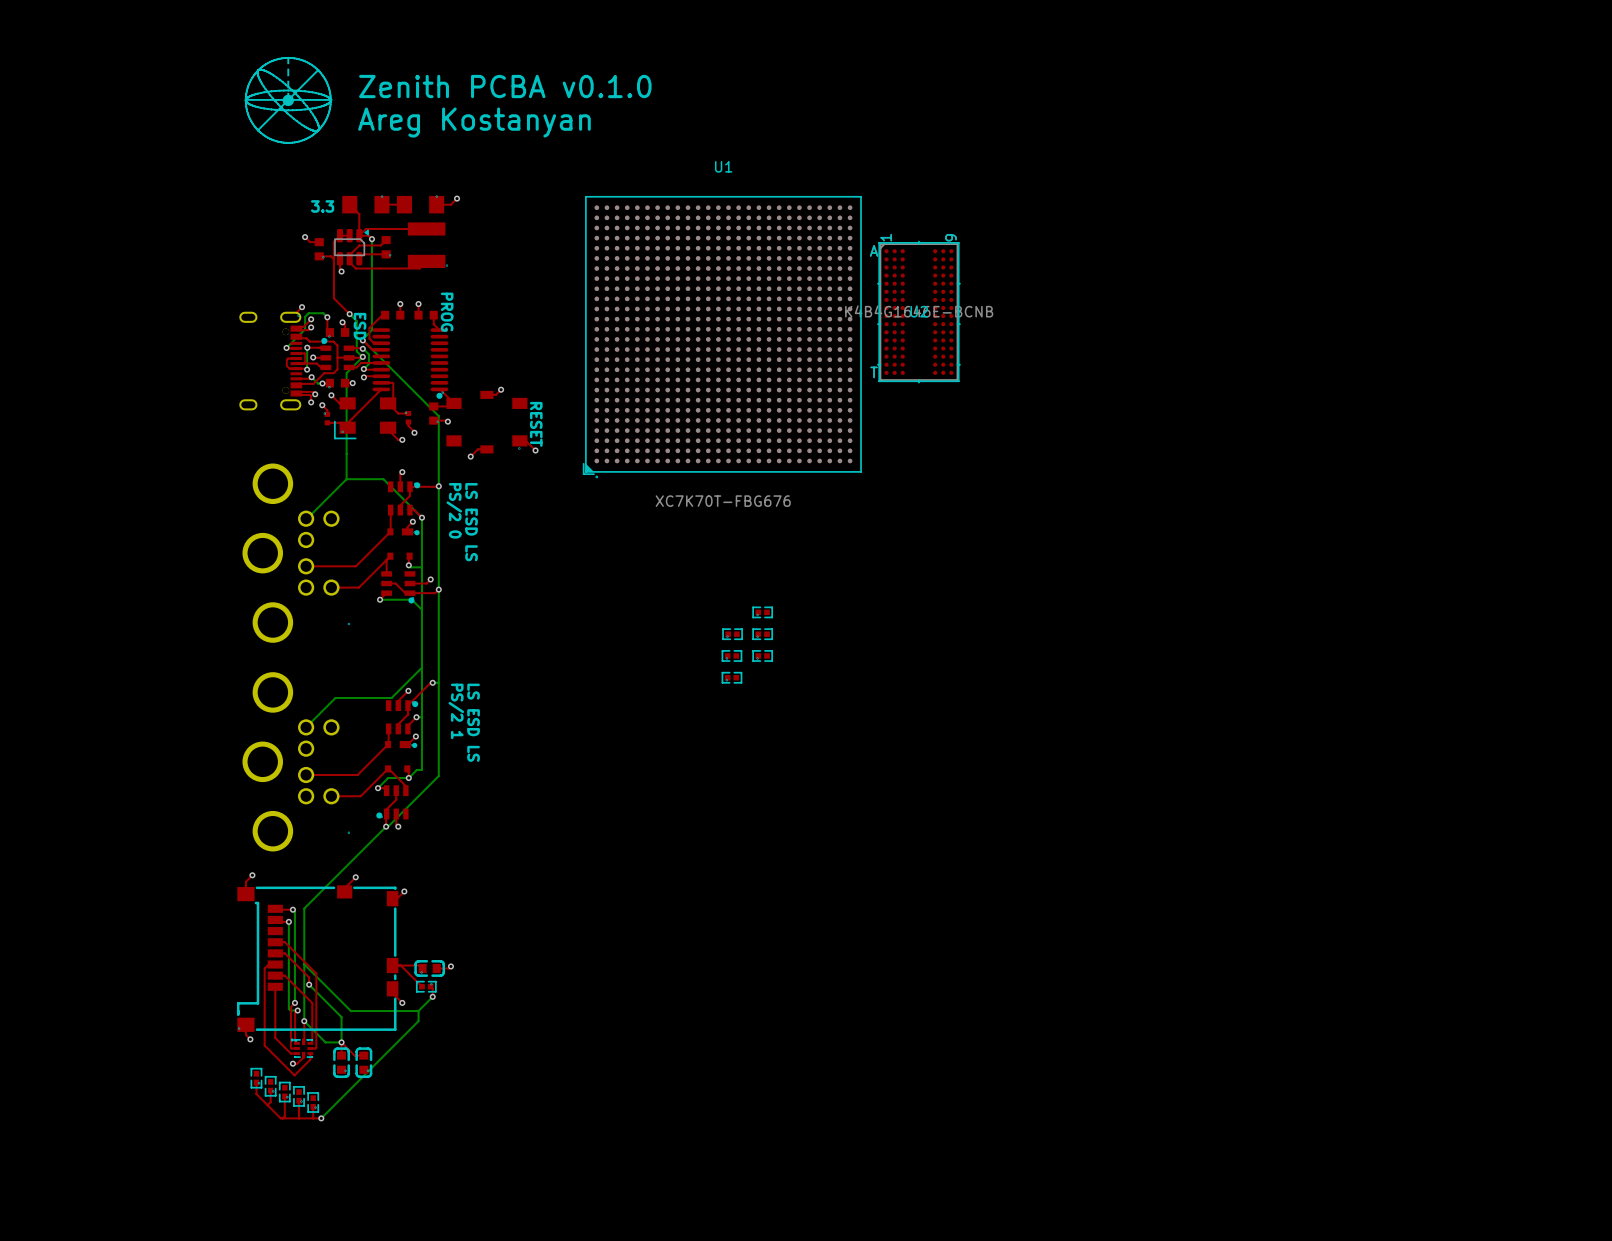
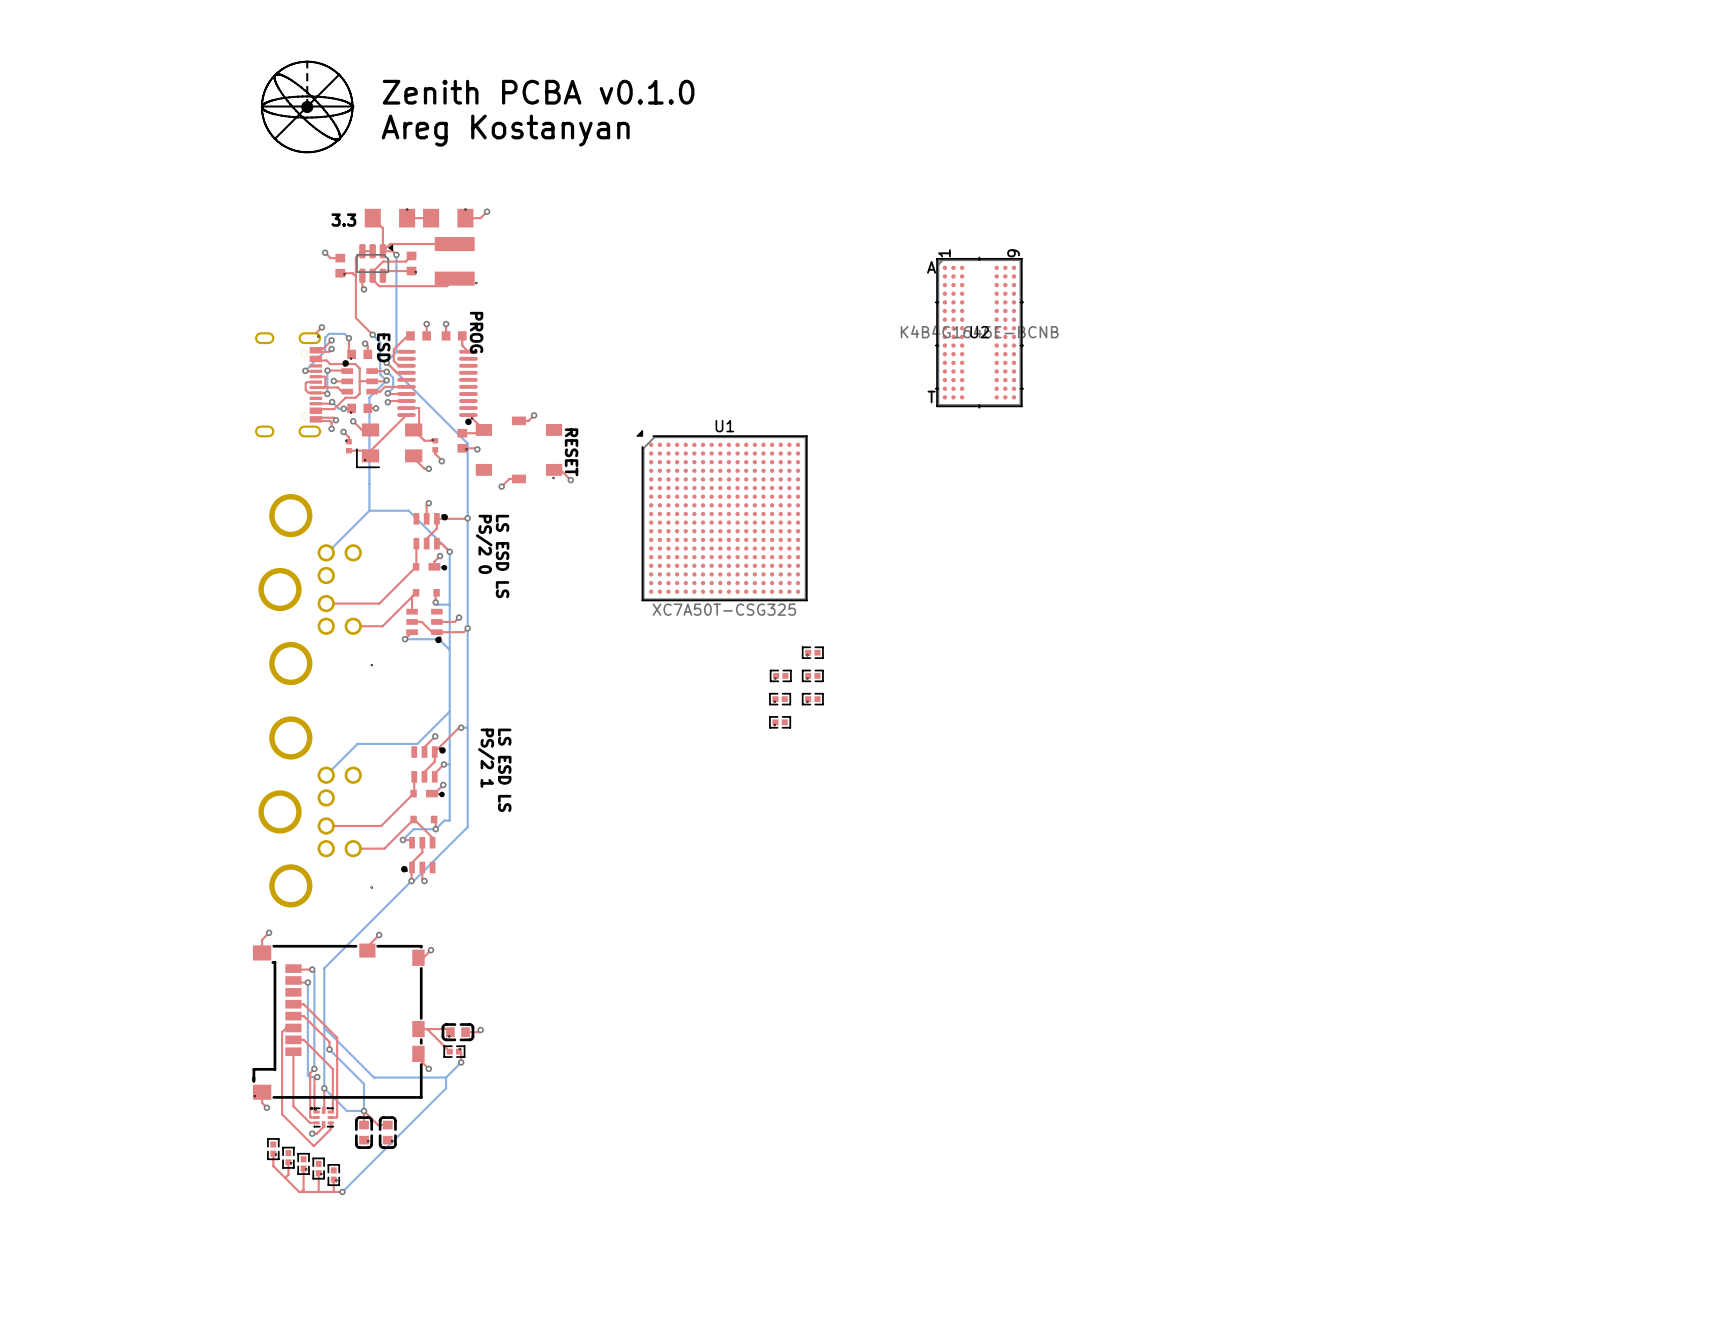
U1 name position: U1 (723, 166) -> U1 (724, 426)
U1 footprint: [582, 196, 862, 478] -> [636, 430, 808, 602]
U1 value: XC7K70T-FBG676 (723, 501) -> XC7A50T-CSG325 (724, 609)

